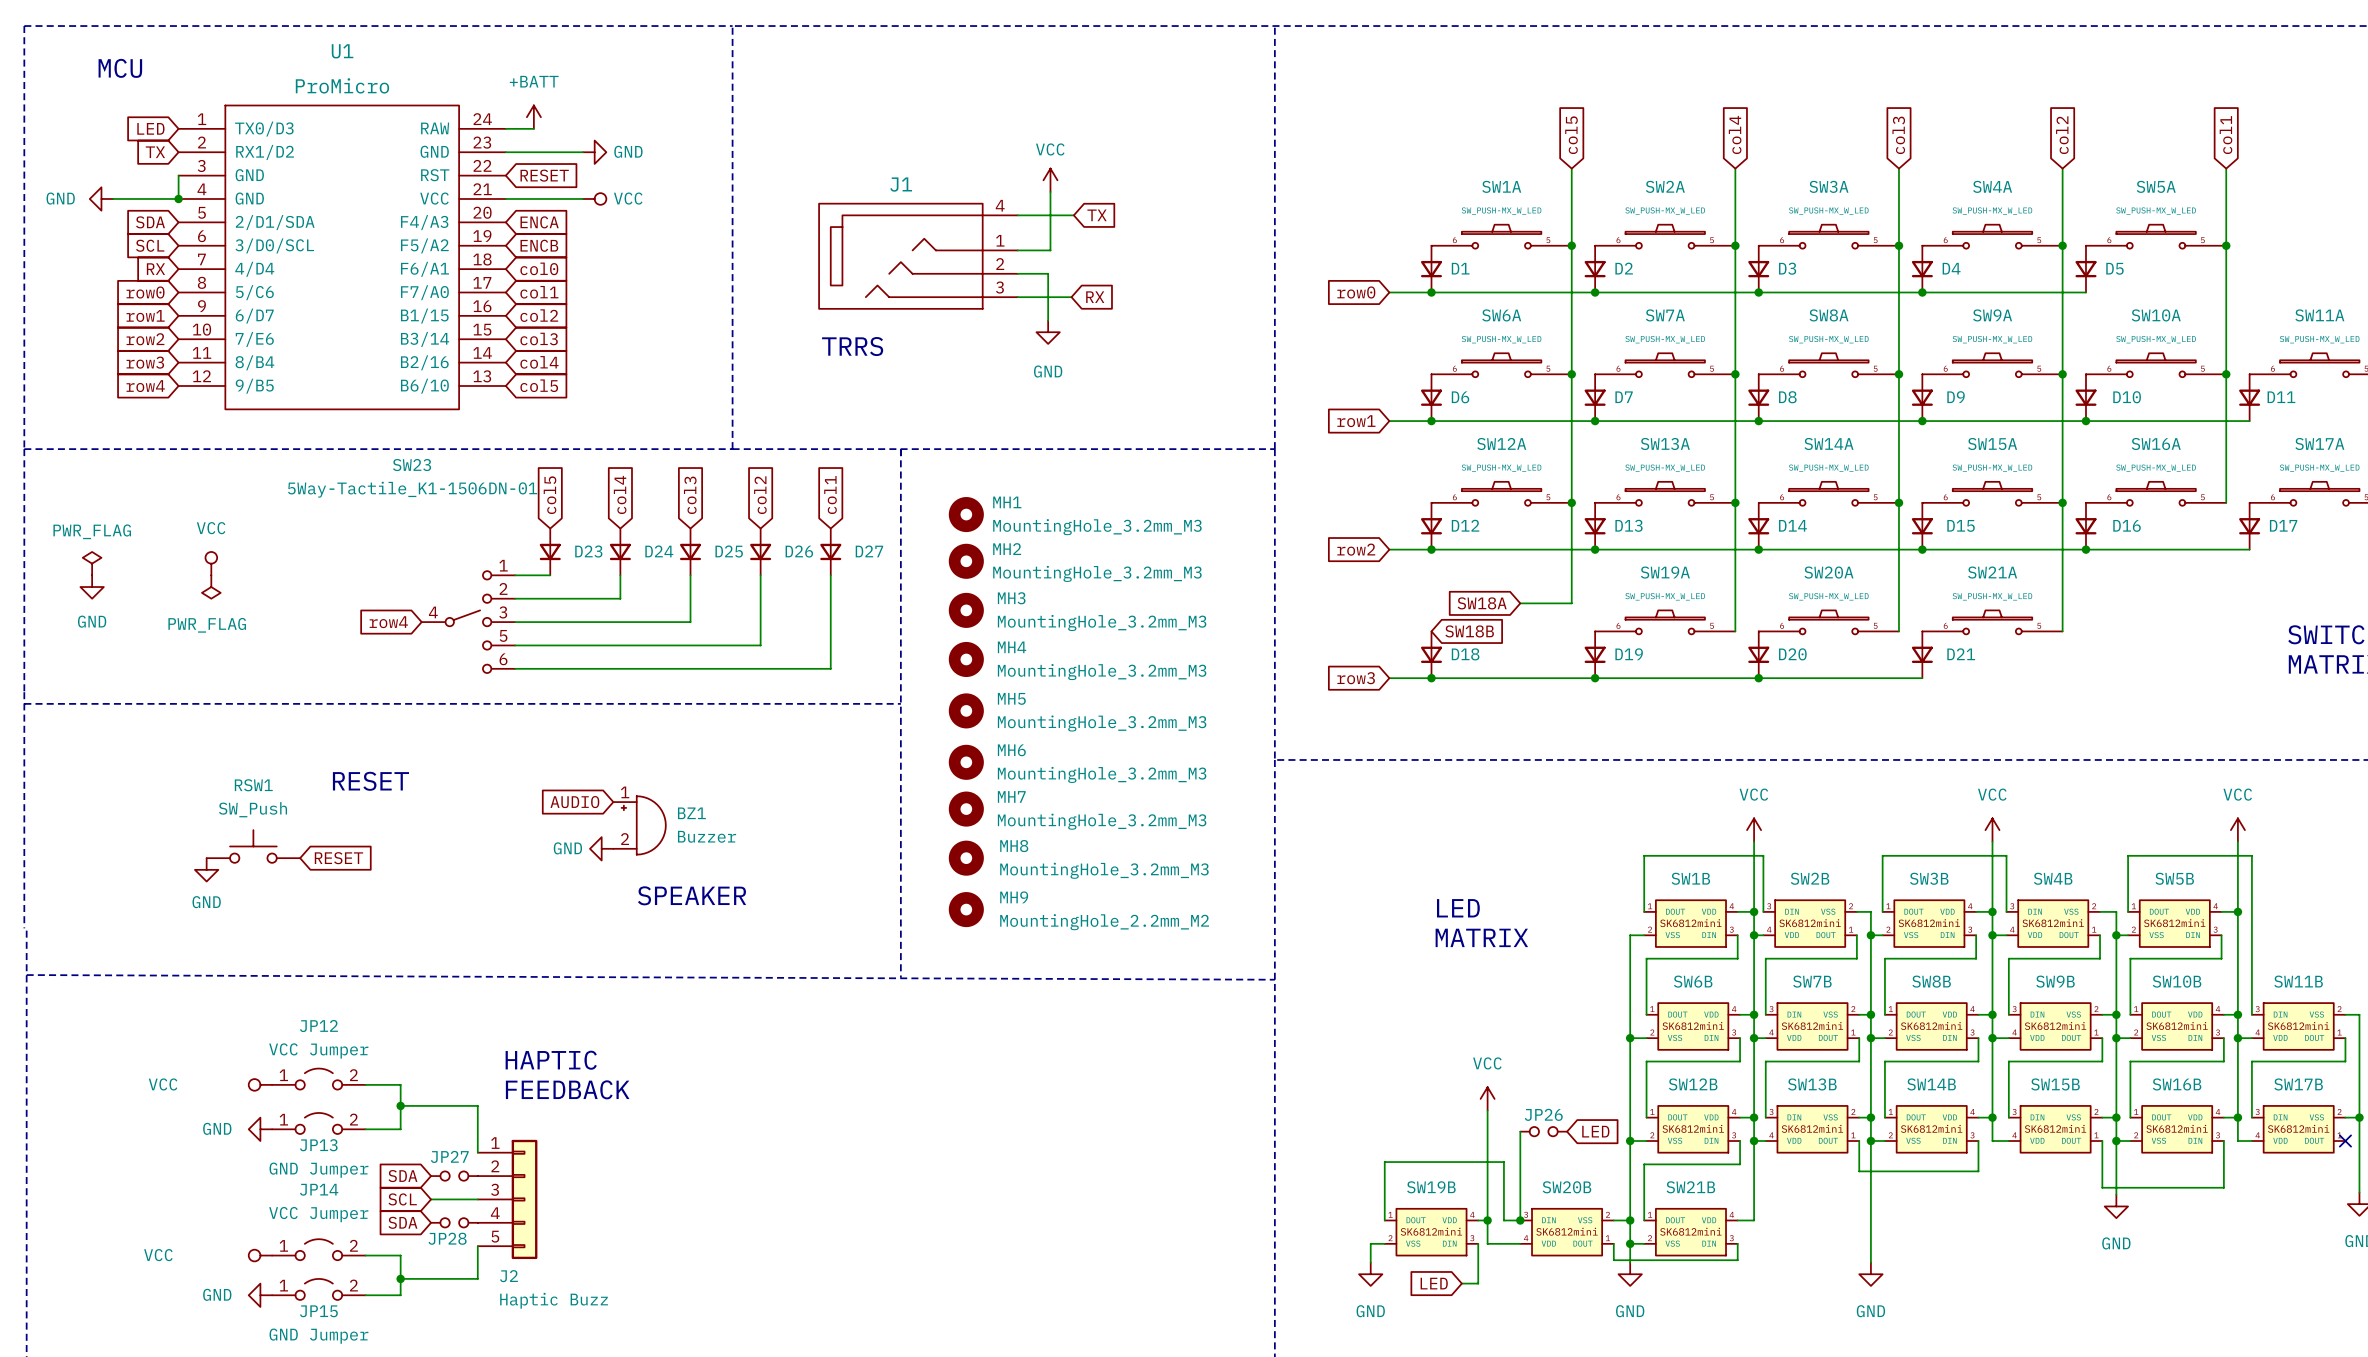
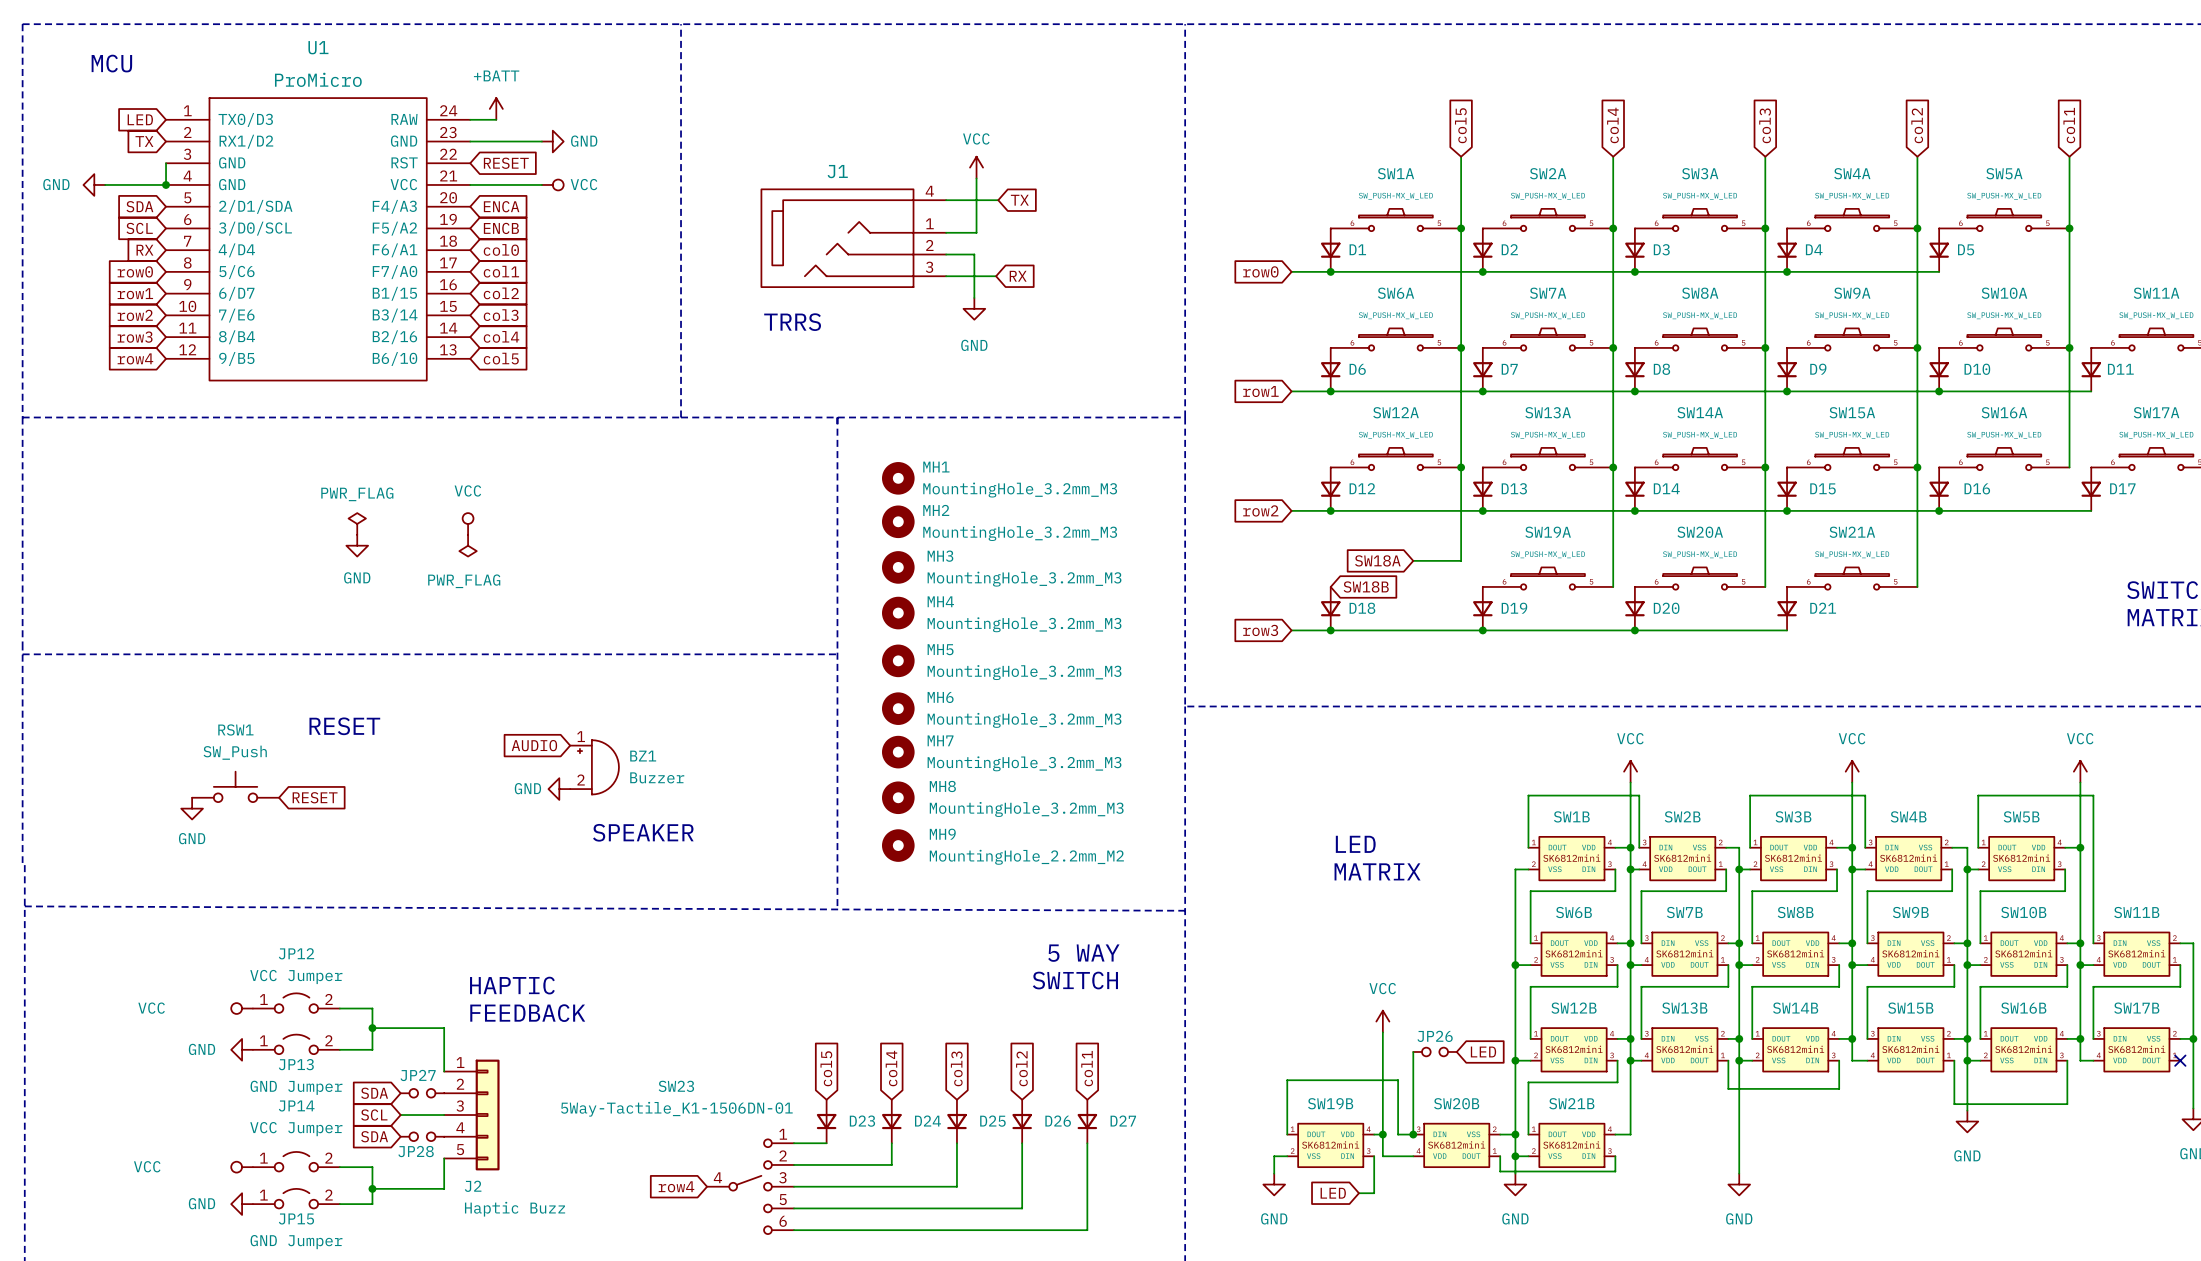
SW23 name position: SW23 (412, 465) -> SW23 (676, 1086)
SW23 value position: 5Way-Tactile_K1-1506DN-01 (412, 489) -> 5Way-Tactile_K1-1506DN-01 (676, 1109)
global label: col4 (620, 494) -> none
global label: col5 (550, 495) -> none
global label: col3 (690, 495) -> none
global label: col2 (760, 495) -> none
global label: col1 (830, 495) -> none
D23 position: (550, 551) -> (826, 1121)
D24 position: (620, 551) -> (891, 1121)
D25 position: (690, 551) -> (956, 1121)
D26 position: (760, 551) -> (1022, 1121)
D27 position: (830, 551) -> (1087, 1121)
power symbol: PWR_FLAG (92, 563) -> none
power symbol: VCC (211, 563) -> none
power symbol: none -> PWR_FLAG (357, 523)
power symbol: none -> VCC (468, 523)
wire: (515, 575) (550, 575) -> none
wire: (620, 575) (620, 598) (515, 598) -> none
wire: (690, 575) (690, 622) (515, 622) -> none
wire: (760, 575) (760, 645) (515, 645) -> none
wire: (830, 575) (830, 668) (515, 668) -> none
power symbol: GND (92, 587) -> none
power symbol: PWR_FLAG (211, 587) -> none
power symbol: none -> GND (357, 545)
power symbol: none -> PWR_FLAG (468, 545)
global label: row4 (388, 622) -> none
SW23 position: (468, 622) -> (750, 1186)
text: none -> 5 WAY (1083, 953)
text: none -> SWITCH (1075, 980)
global label: none -> col5 (826, 1068)
global label: none -> col4 (891, 1068)
global label: none -> col3 (956, 1068)
global label: none -> col2 (1021, 1068)
global label: none -> col1 (1087, 1068)
wire: none -> (794, 1143) (826, 1143)
wire: none -> (891, 1143) (891, 1164) (794, 1164)
wire: none -> (956, 1143) (956, 1186) (794, 1186)
wire: none -> (1022, 1143) (1022, 1208) (794, 1208)
wire: none -> (1087, 1143) (1087, 1230) (794, 1230)
global label: none -> row4 (676, 1186)

